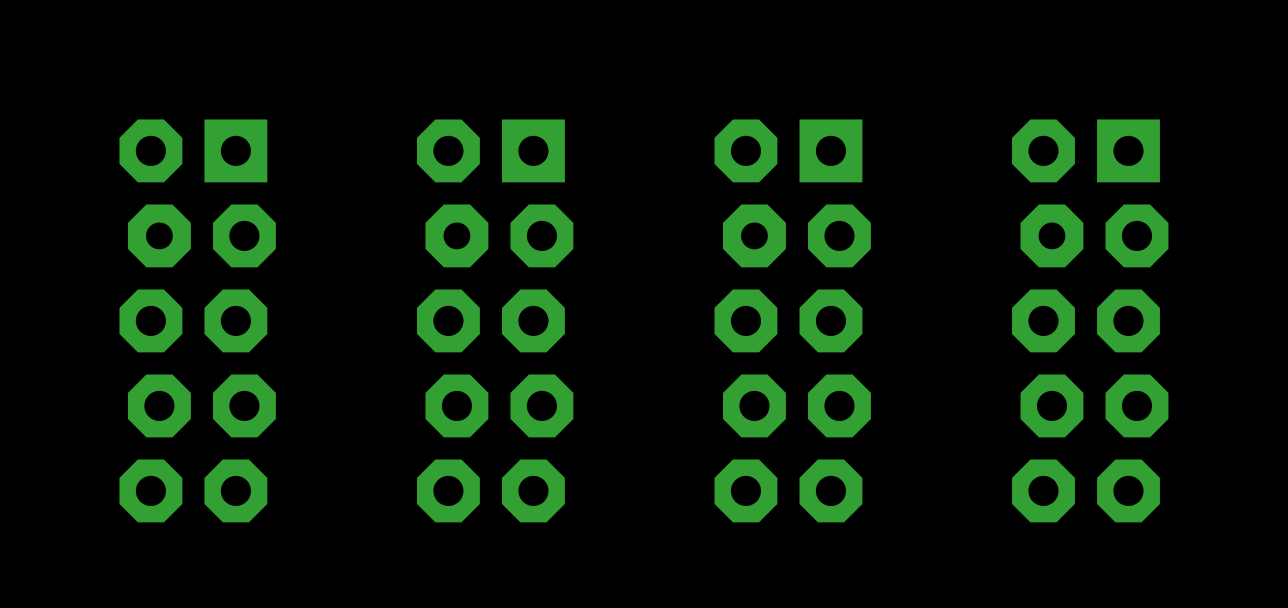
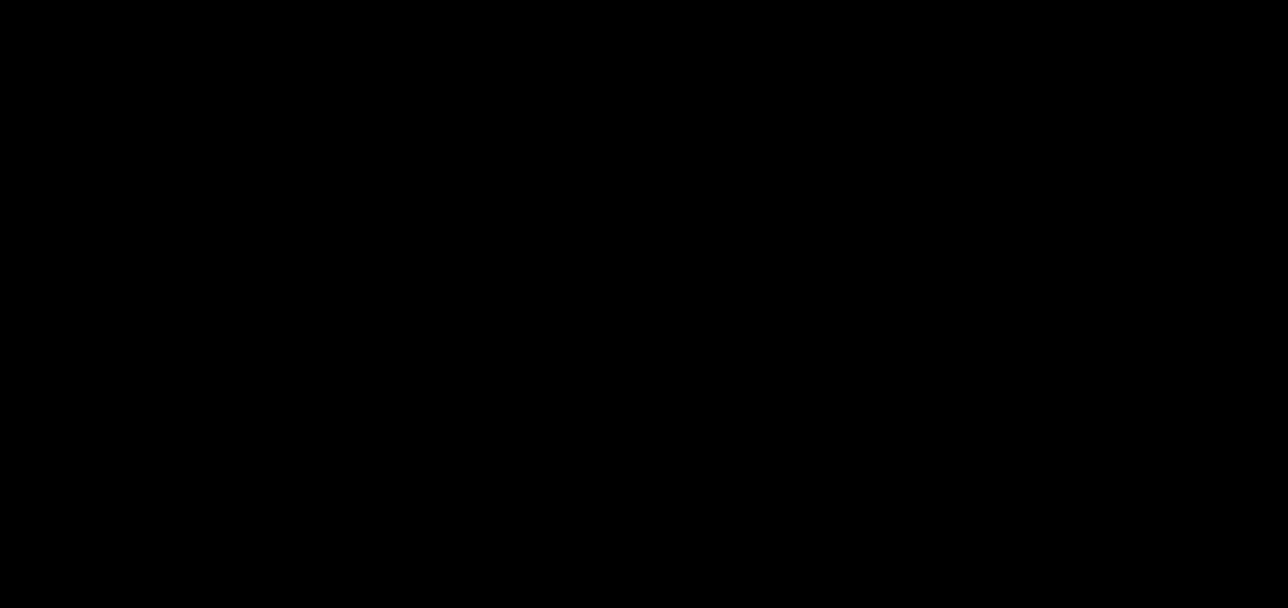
part: (197, 320) -> none
part: (495, 320) -> none
part: (792, 320) -> none
part: (1090, 320) -> none

